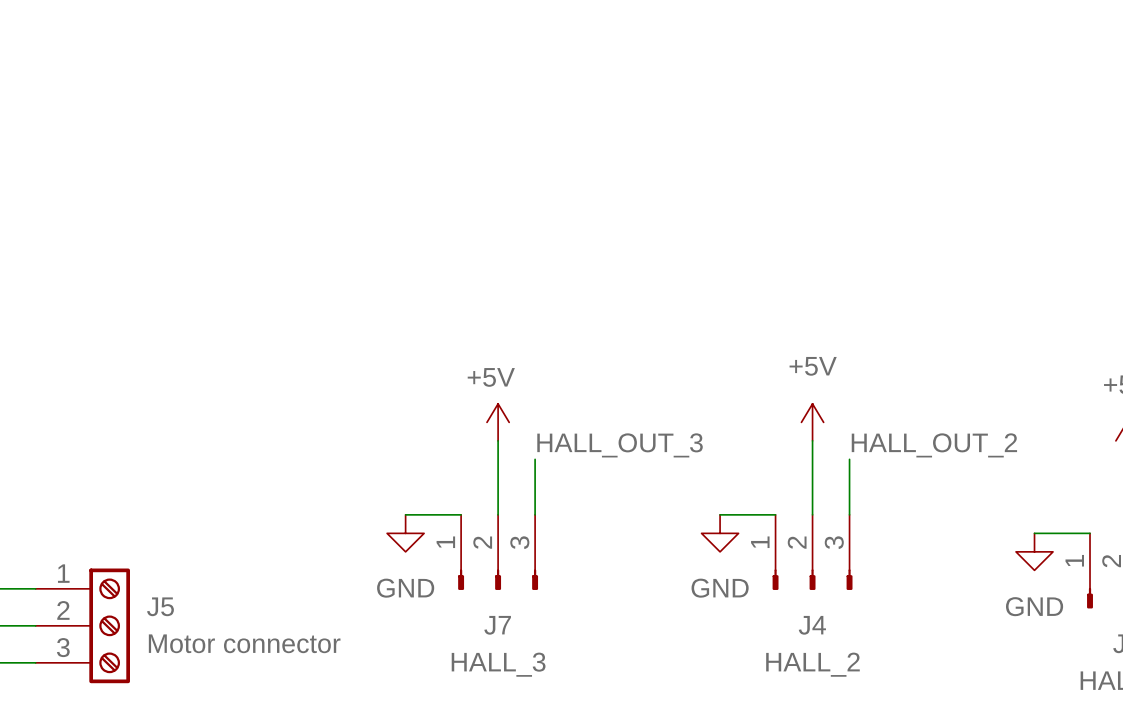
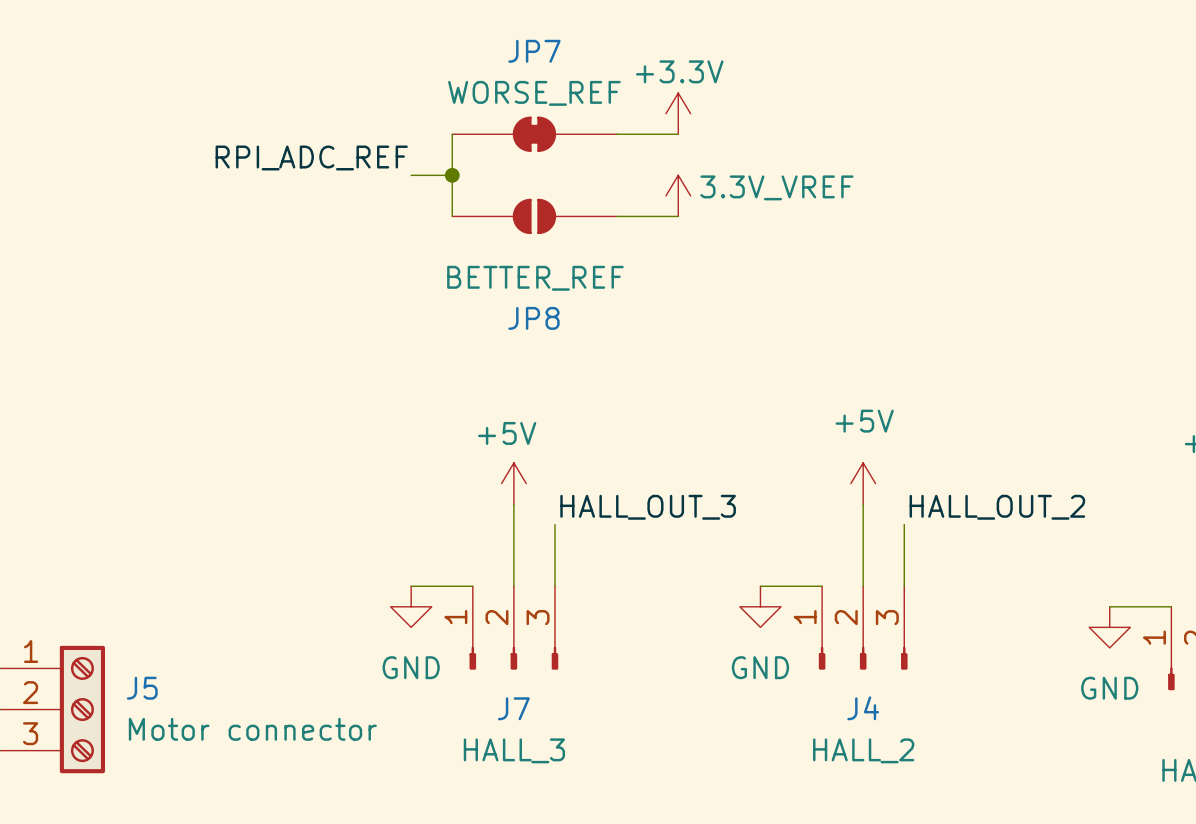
power symbol: none -> +3.3V (678, 113)
wire: none -> (452, 134) (452, 216)
JP7: none -> WORSE_REF (534, 134)
wire: none -> (616, 134) (678, 134)
label: none -> RPI_ADC_REF (311, 157)
wire: none -> (411, 175) (452, 175)
junction: none -> (452, 175)
power symbol: none -> 3.3V_VREF (678, 195)
JP8: none -> BETTER_REF (534, 216)
wire: none -> (616, 216) (678, 216)

